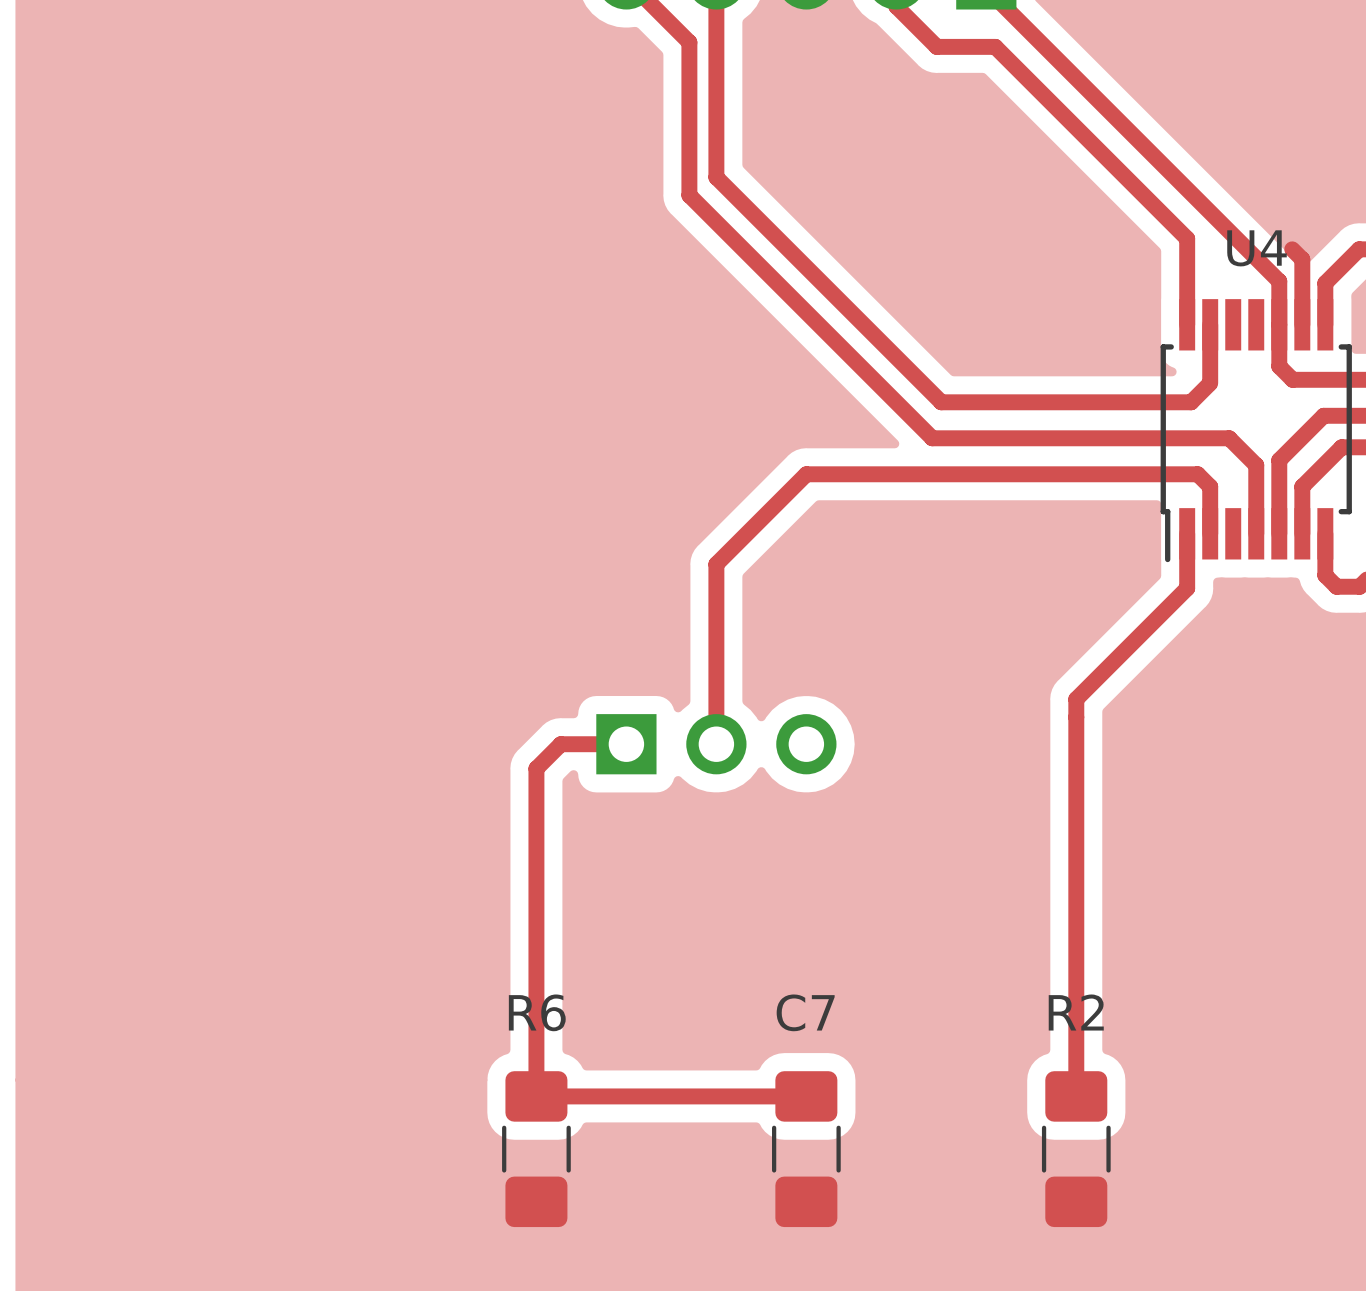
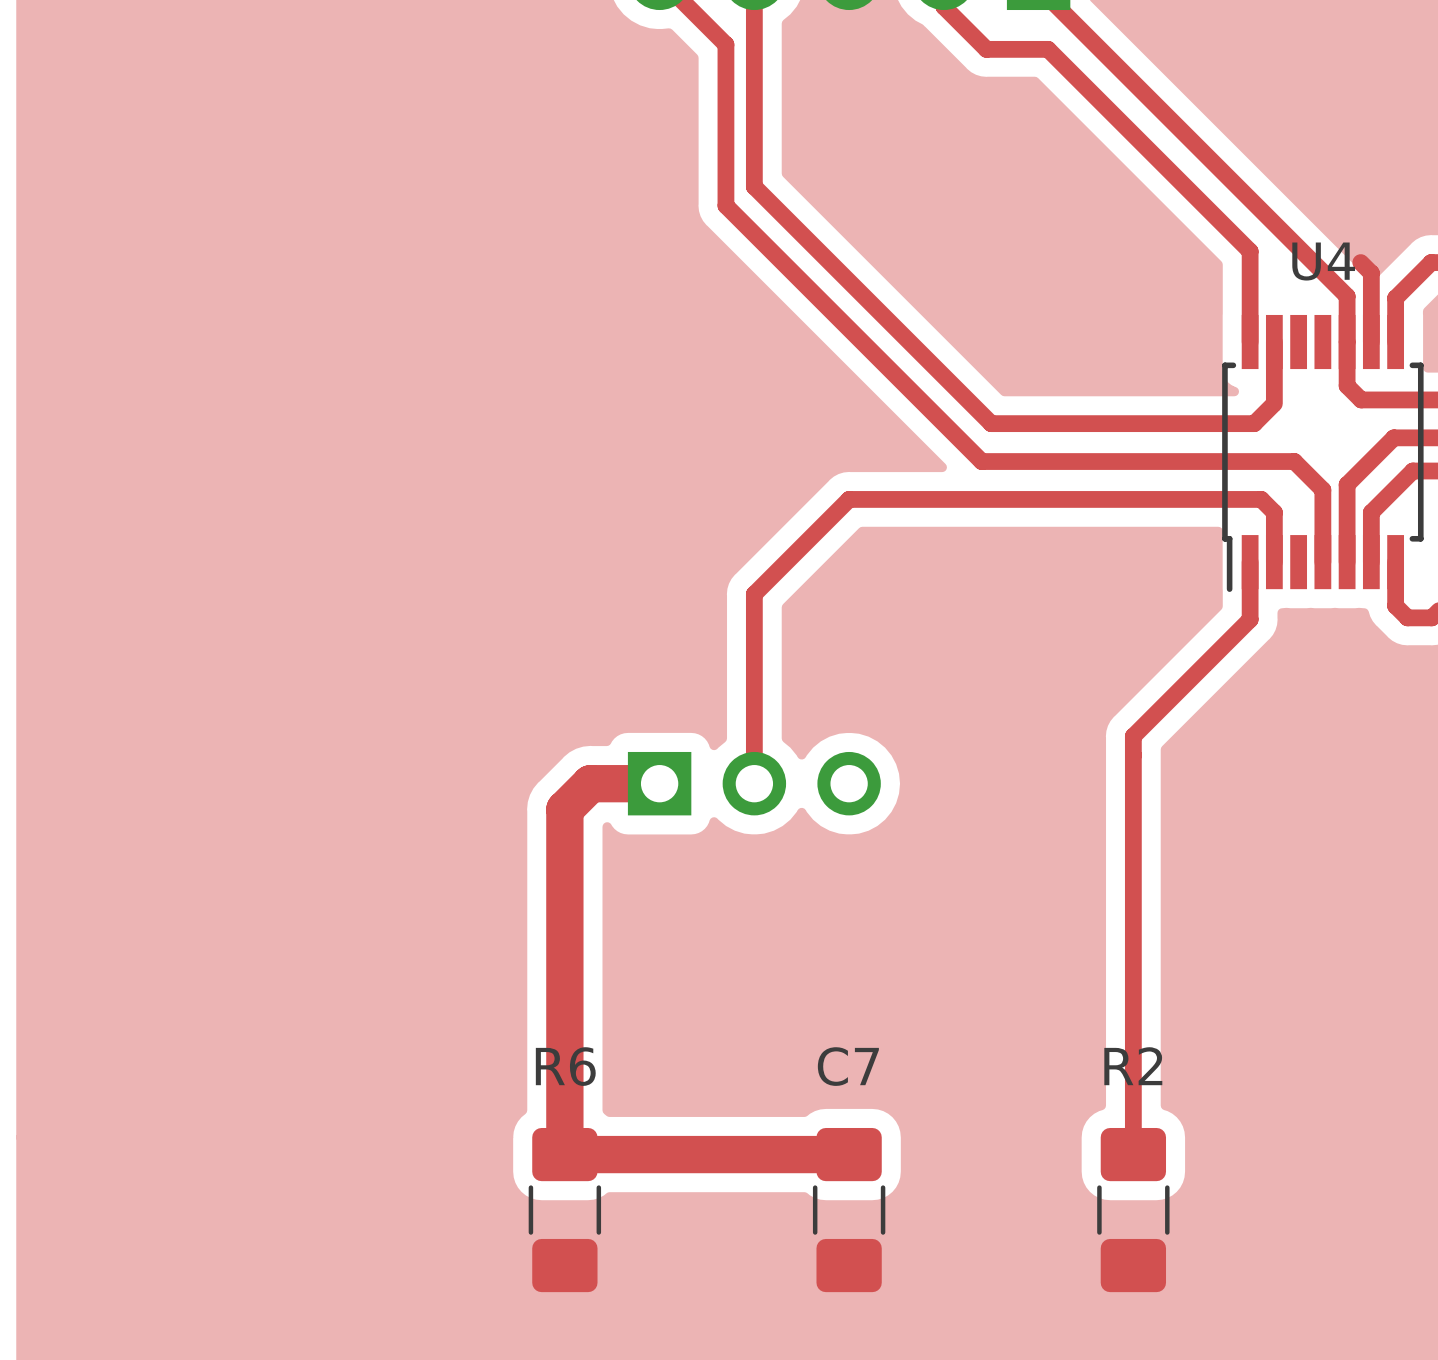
top track width: thin (626, 744) (560, 744) (536, 768) (536, 1096) (806, 1096) -> thick (659, 783) (590, 783) (564, 809) (564, 1154) (849, 1154)

